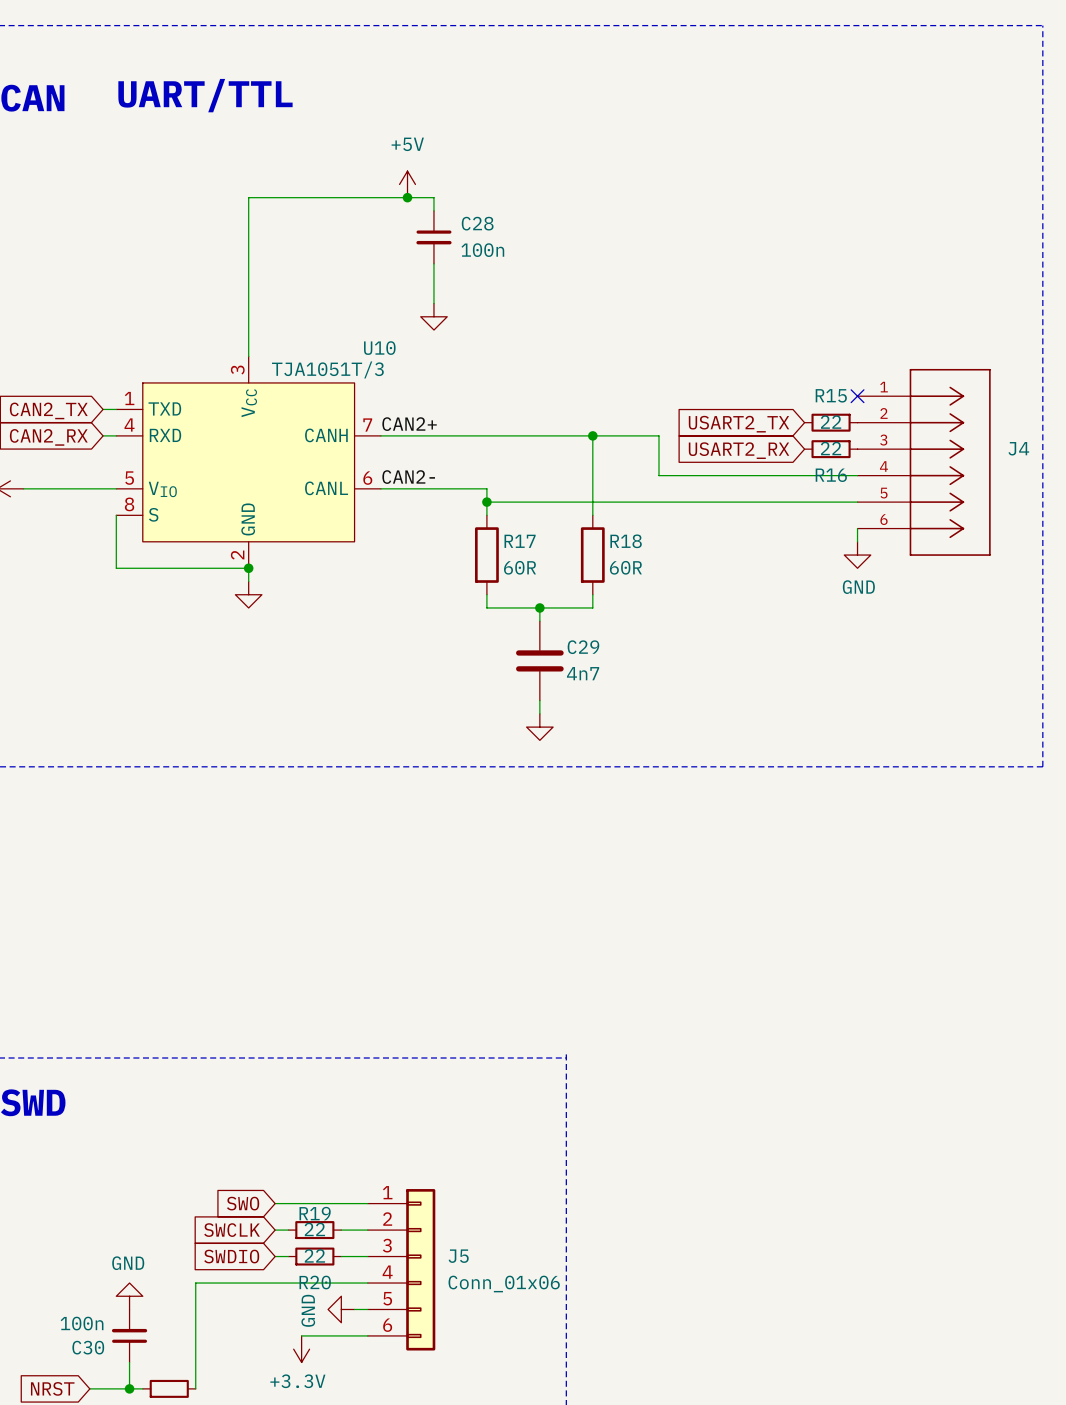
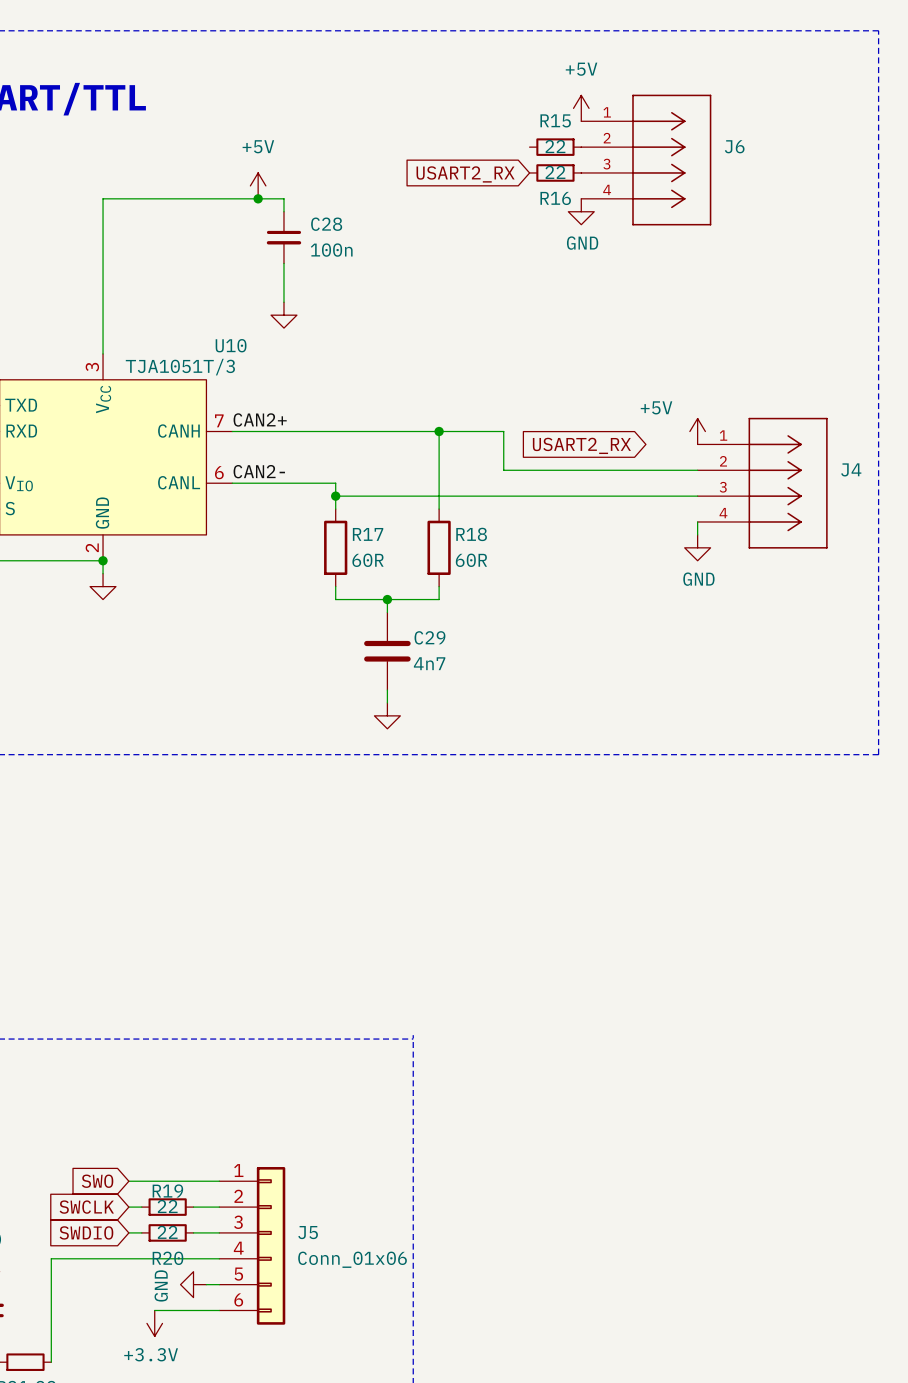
power symbol: none -> +5V (581, 108)
J6: none -> (646, 160)
global label: none -> USART2_RX (465, 174)
power symbol: none -> GND (581, 211)
J4 symbol: [857, 368, 991, 556] -> [697, 417, 828, 549]
no-connect mark: (857, 396) -> none
R15 position: (831, 422) -> (555, 147)
global label: USART2_TX (739, 424) -> none
power symbol: none -> +5V (697, 431)
R16 position: (831, 449) -> (555, 172)

